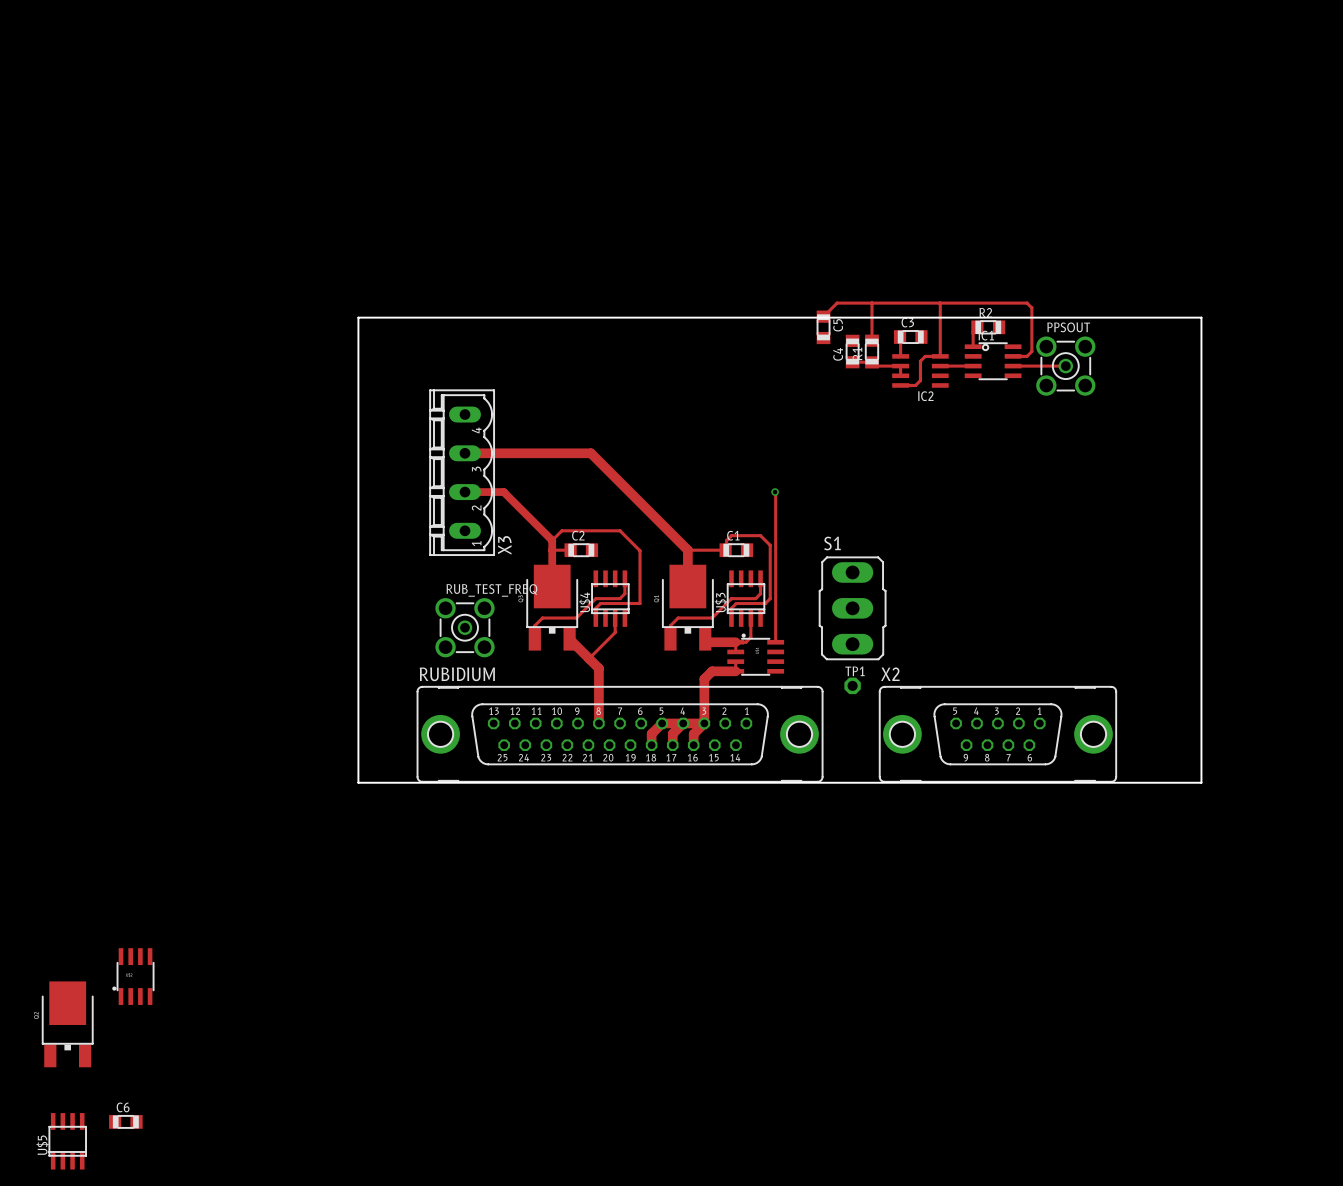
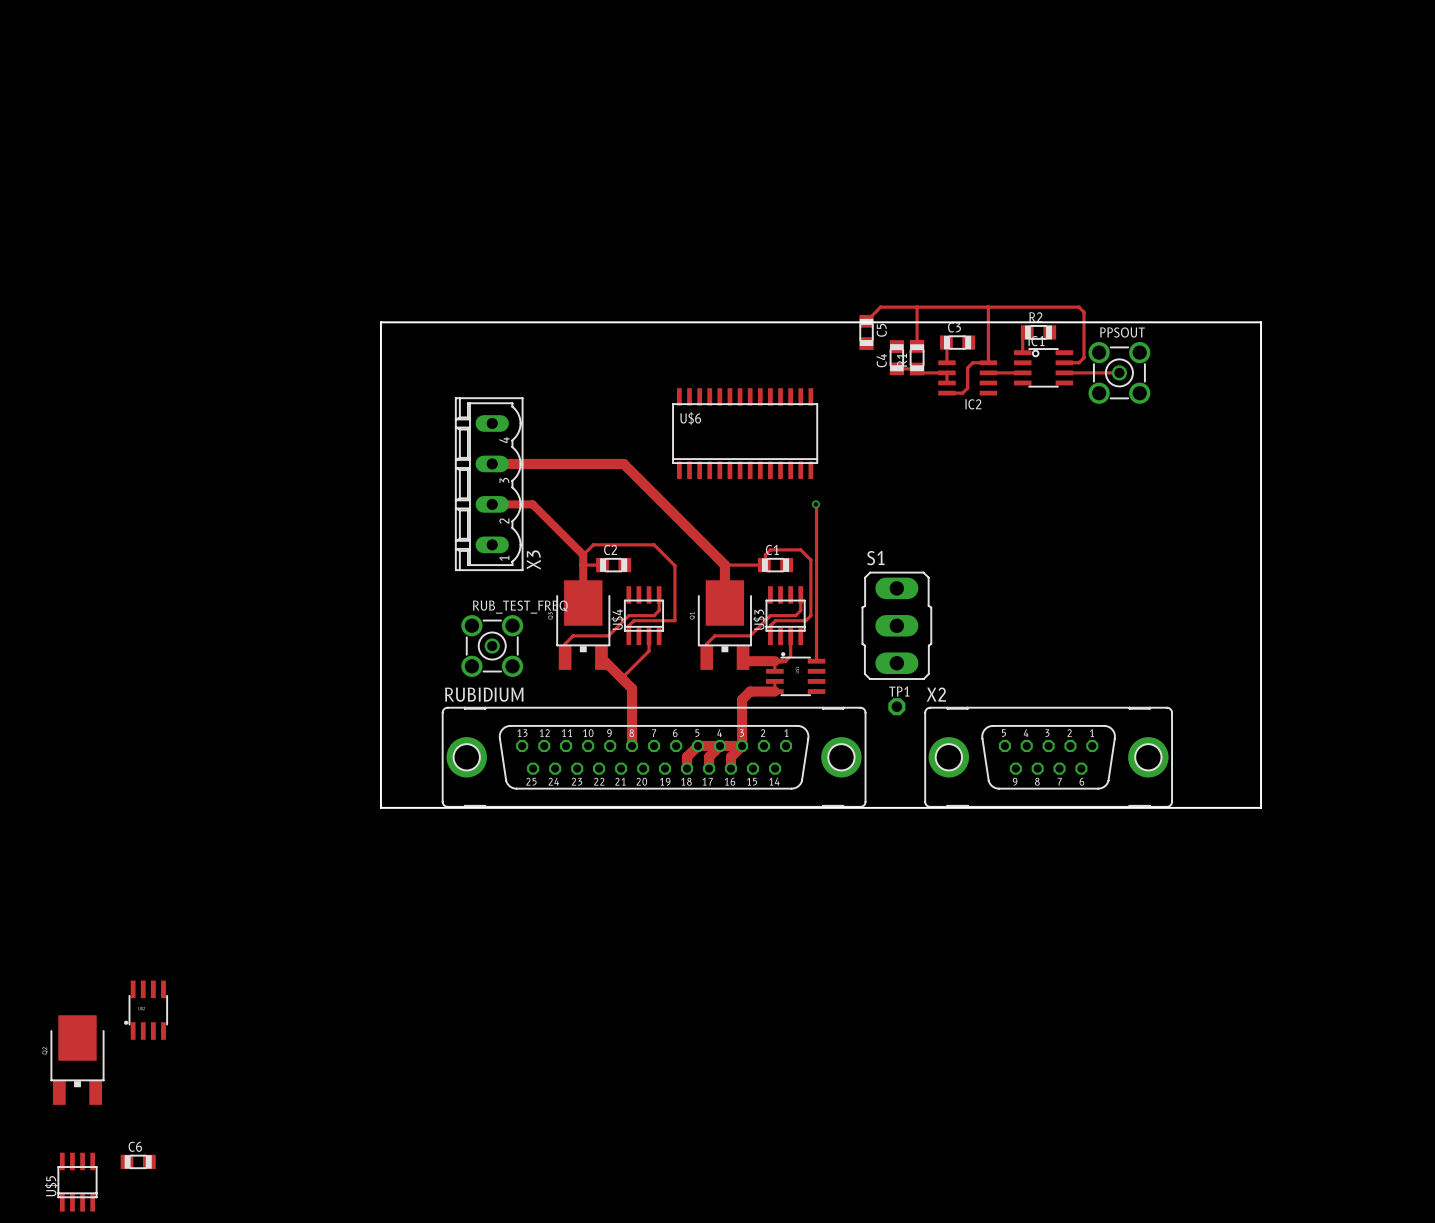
U$6: none -> (745, 433)

